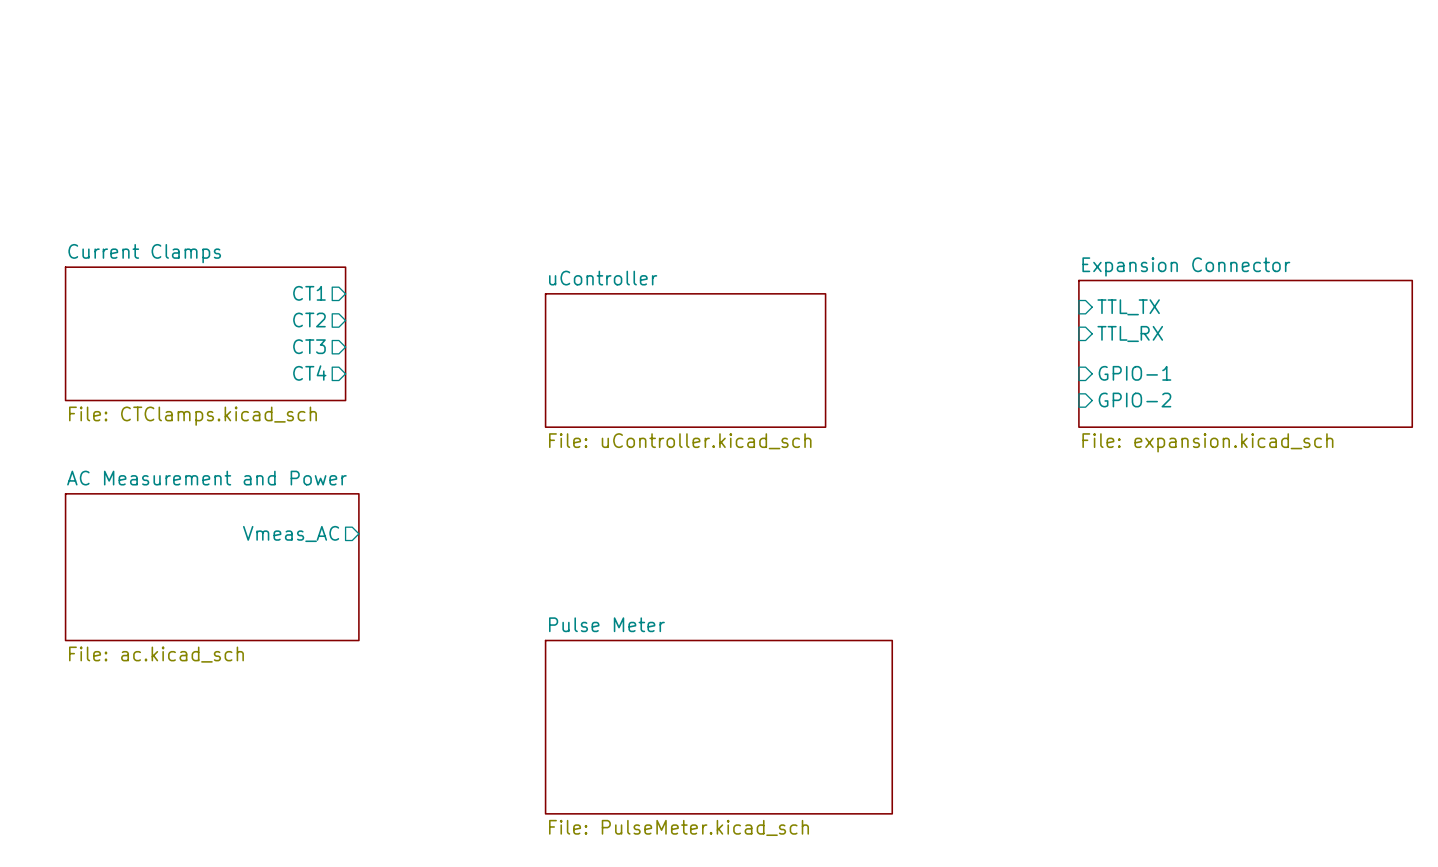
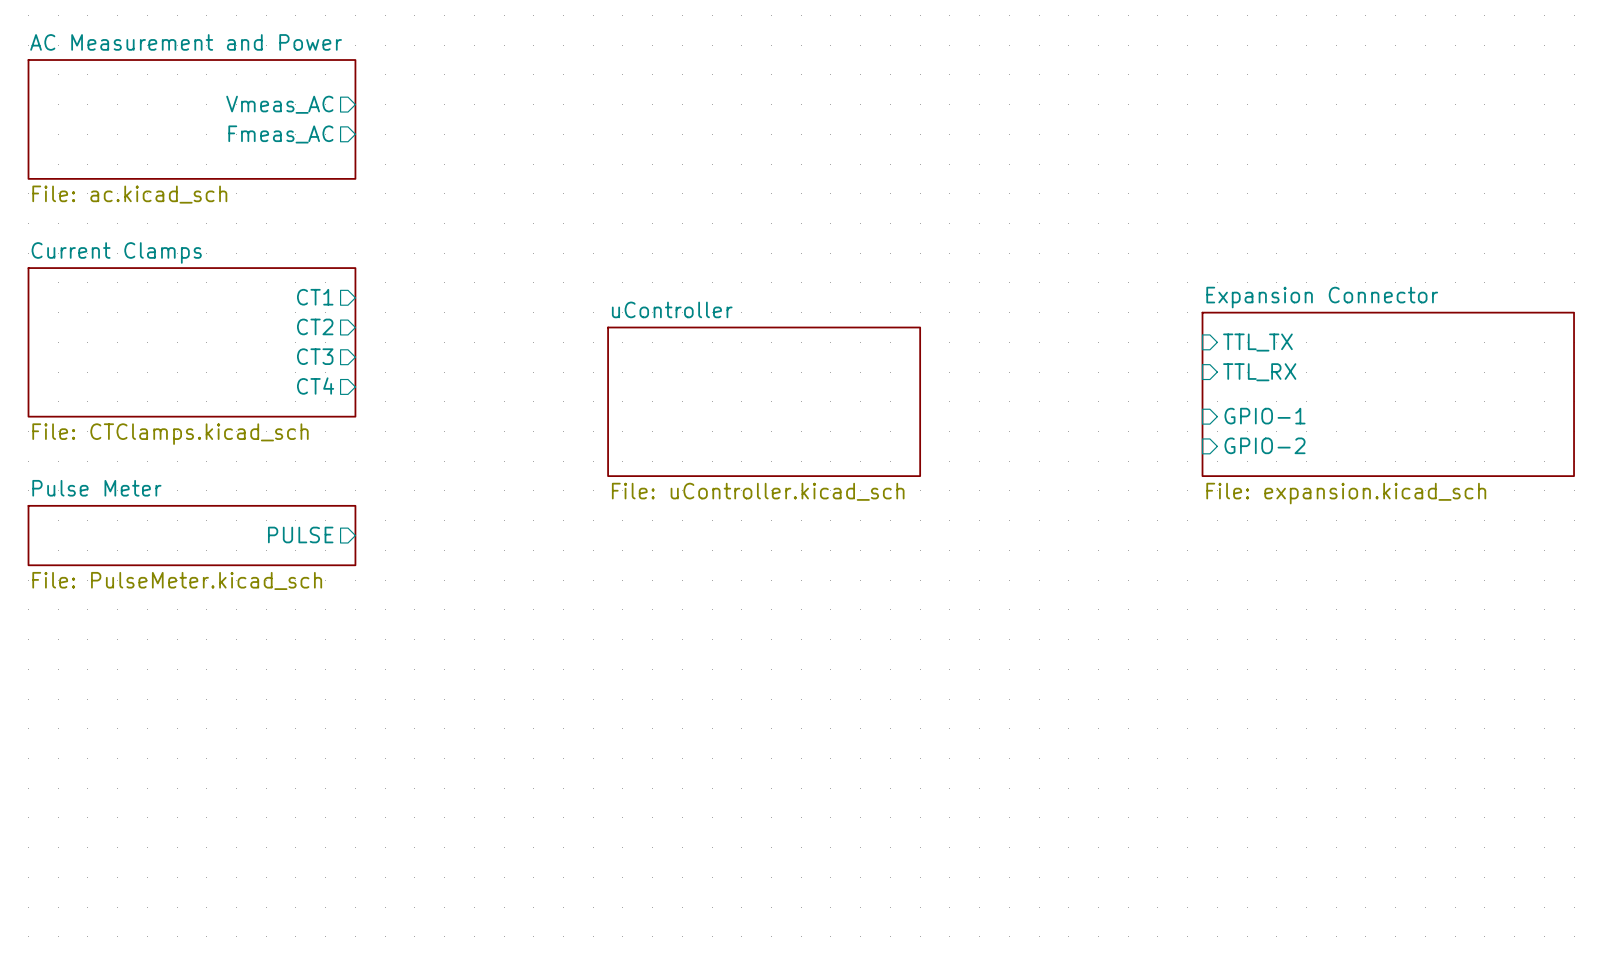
sheet pin: none -> Vmeas_AC (279, 104)
sheet AC Measurement and Power: none -> File: ac.kicad_sch (191, 119)
sheet pin: none -> Fmeas_AC (280, 134)
sheet pin position: CT1 (309, 293) -> CT1 (315, 297)
sheet Current Clamps: none -> File: CTClamps.kicad_sch (191, 342)
sheet pin position: CT2 (309, 320) -> CT2 (315, 326)
sheet Current Clamps: File: CTClamps.kicad_sch (205, 333) -> none
sheet pin position: CT3 (309, 346) -> CT3 (315, 356)
sheet pin position: CT4 (309, 373) -> CT4 (315, 386)
sheet Pulse Meter: none -> File: PulseMeter.kicad_sch (191, 535)
sheet pin: none -> PULSE (300, 535)
sheet pin: Vmeas_AC (291, 533) -> none
sheet AC Measurement and Power: File: ac.kicad_sch (212, 567) -> none
sheet Pulse Meter: File: PulseMeter.kicad_sch (718, 727) -> none

